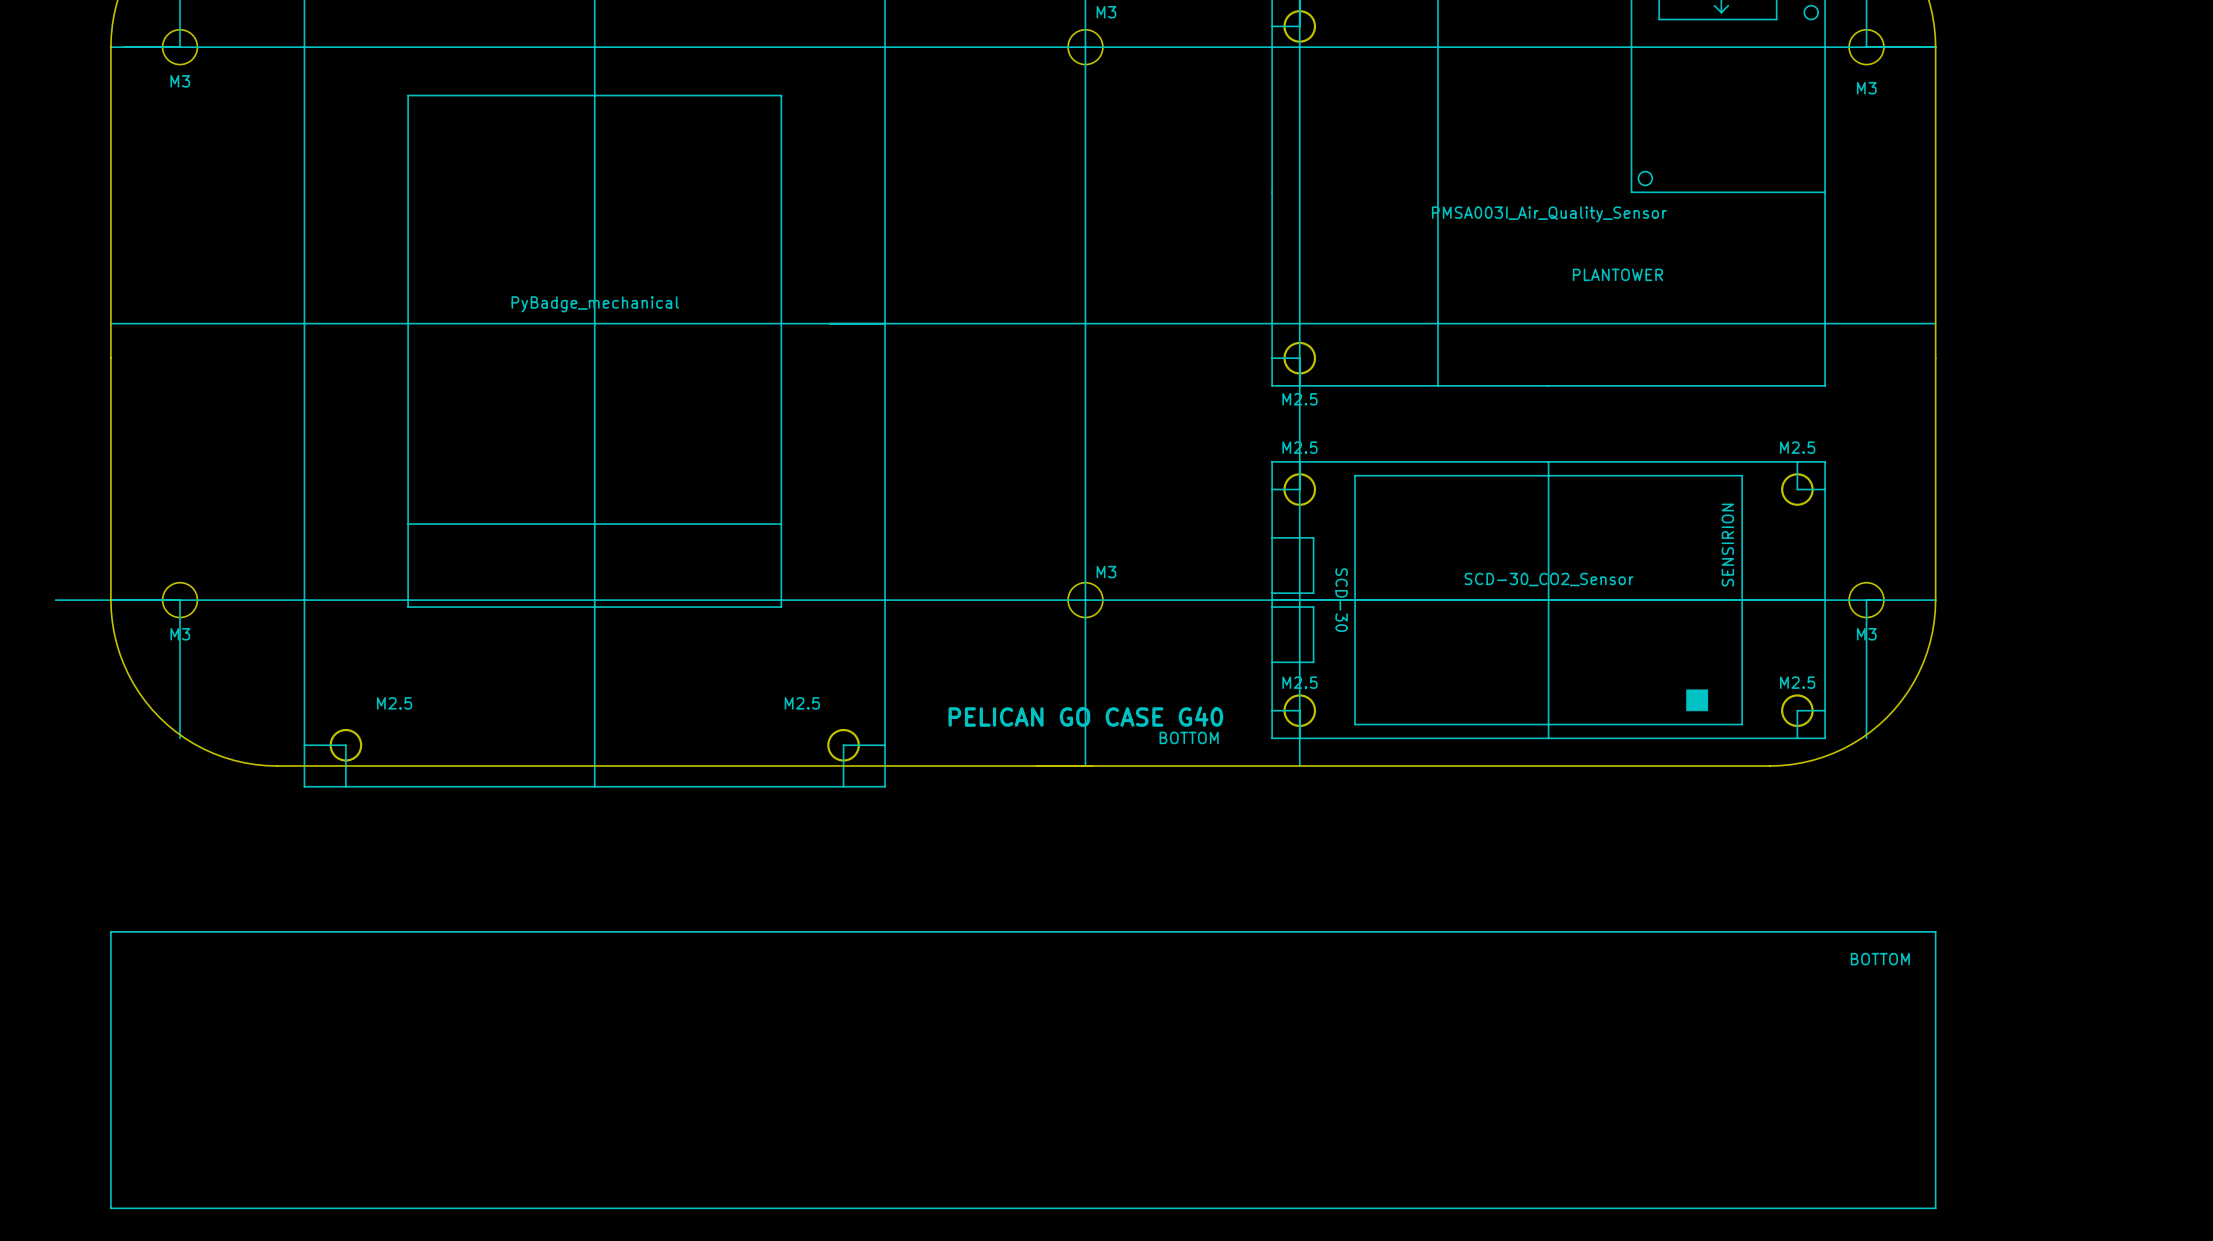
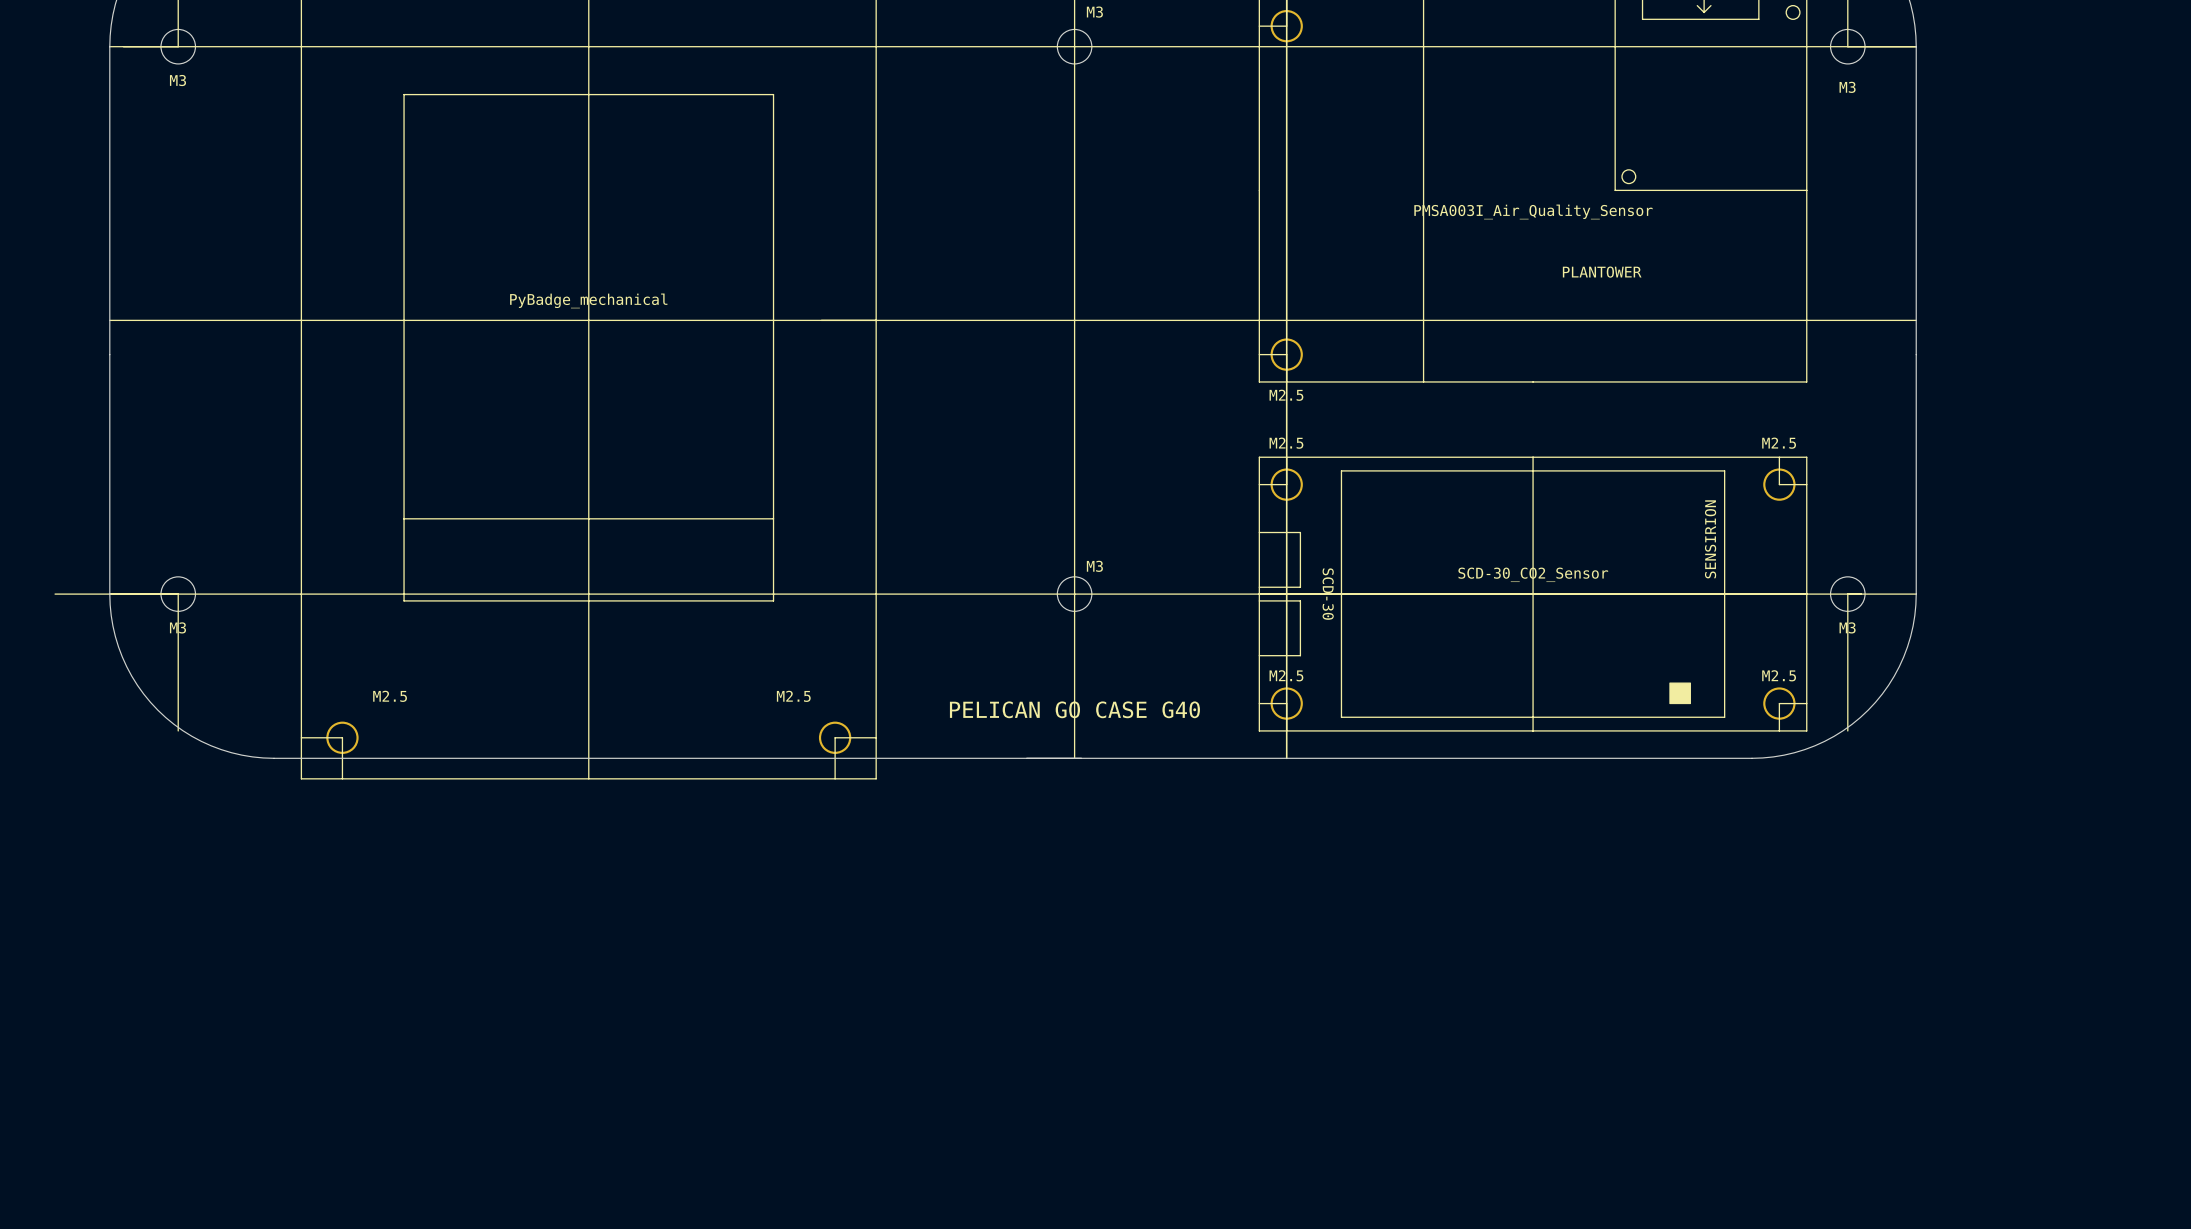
text: BOTTOM (1189, 737) -> none
line: (110, 931) (110, 1208) (1935, 1208) (1935, 931) (110, 931) -> none
text: BOTTOM (1880, 959) -> none

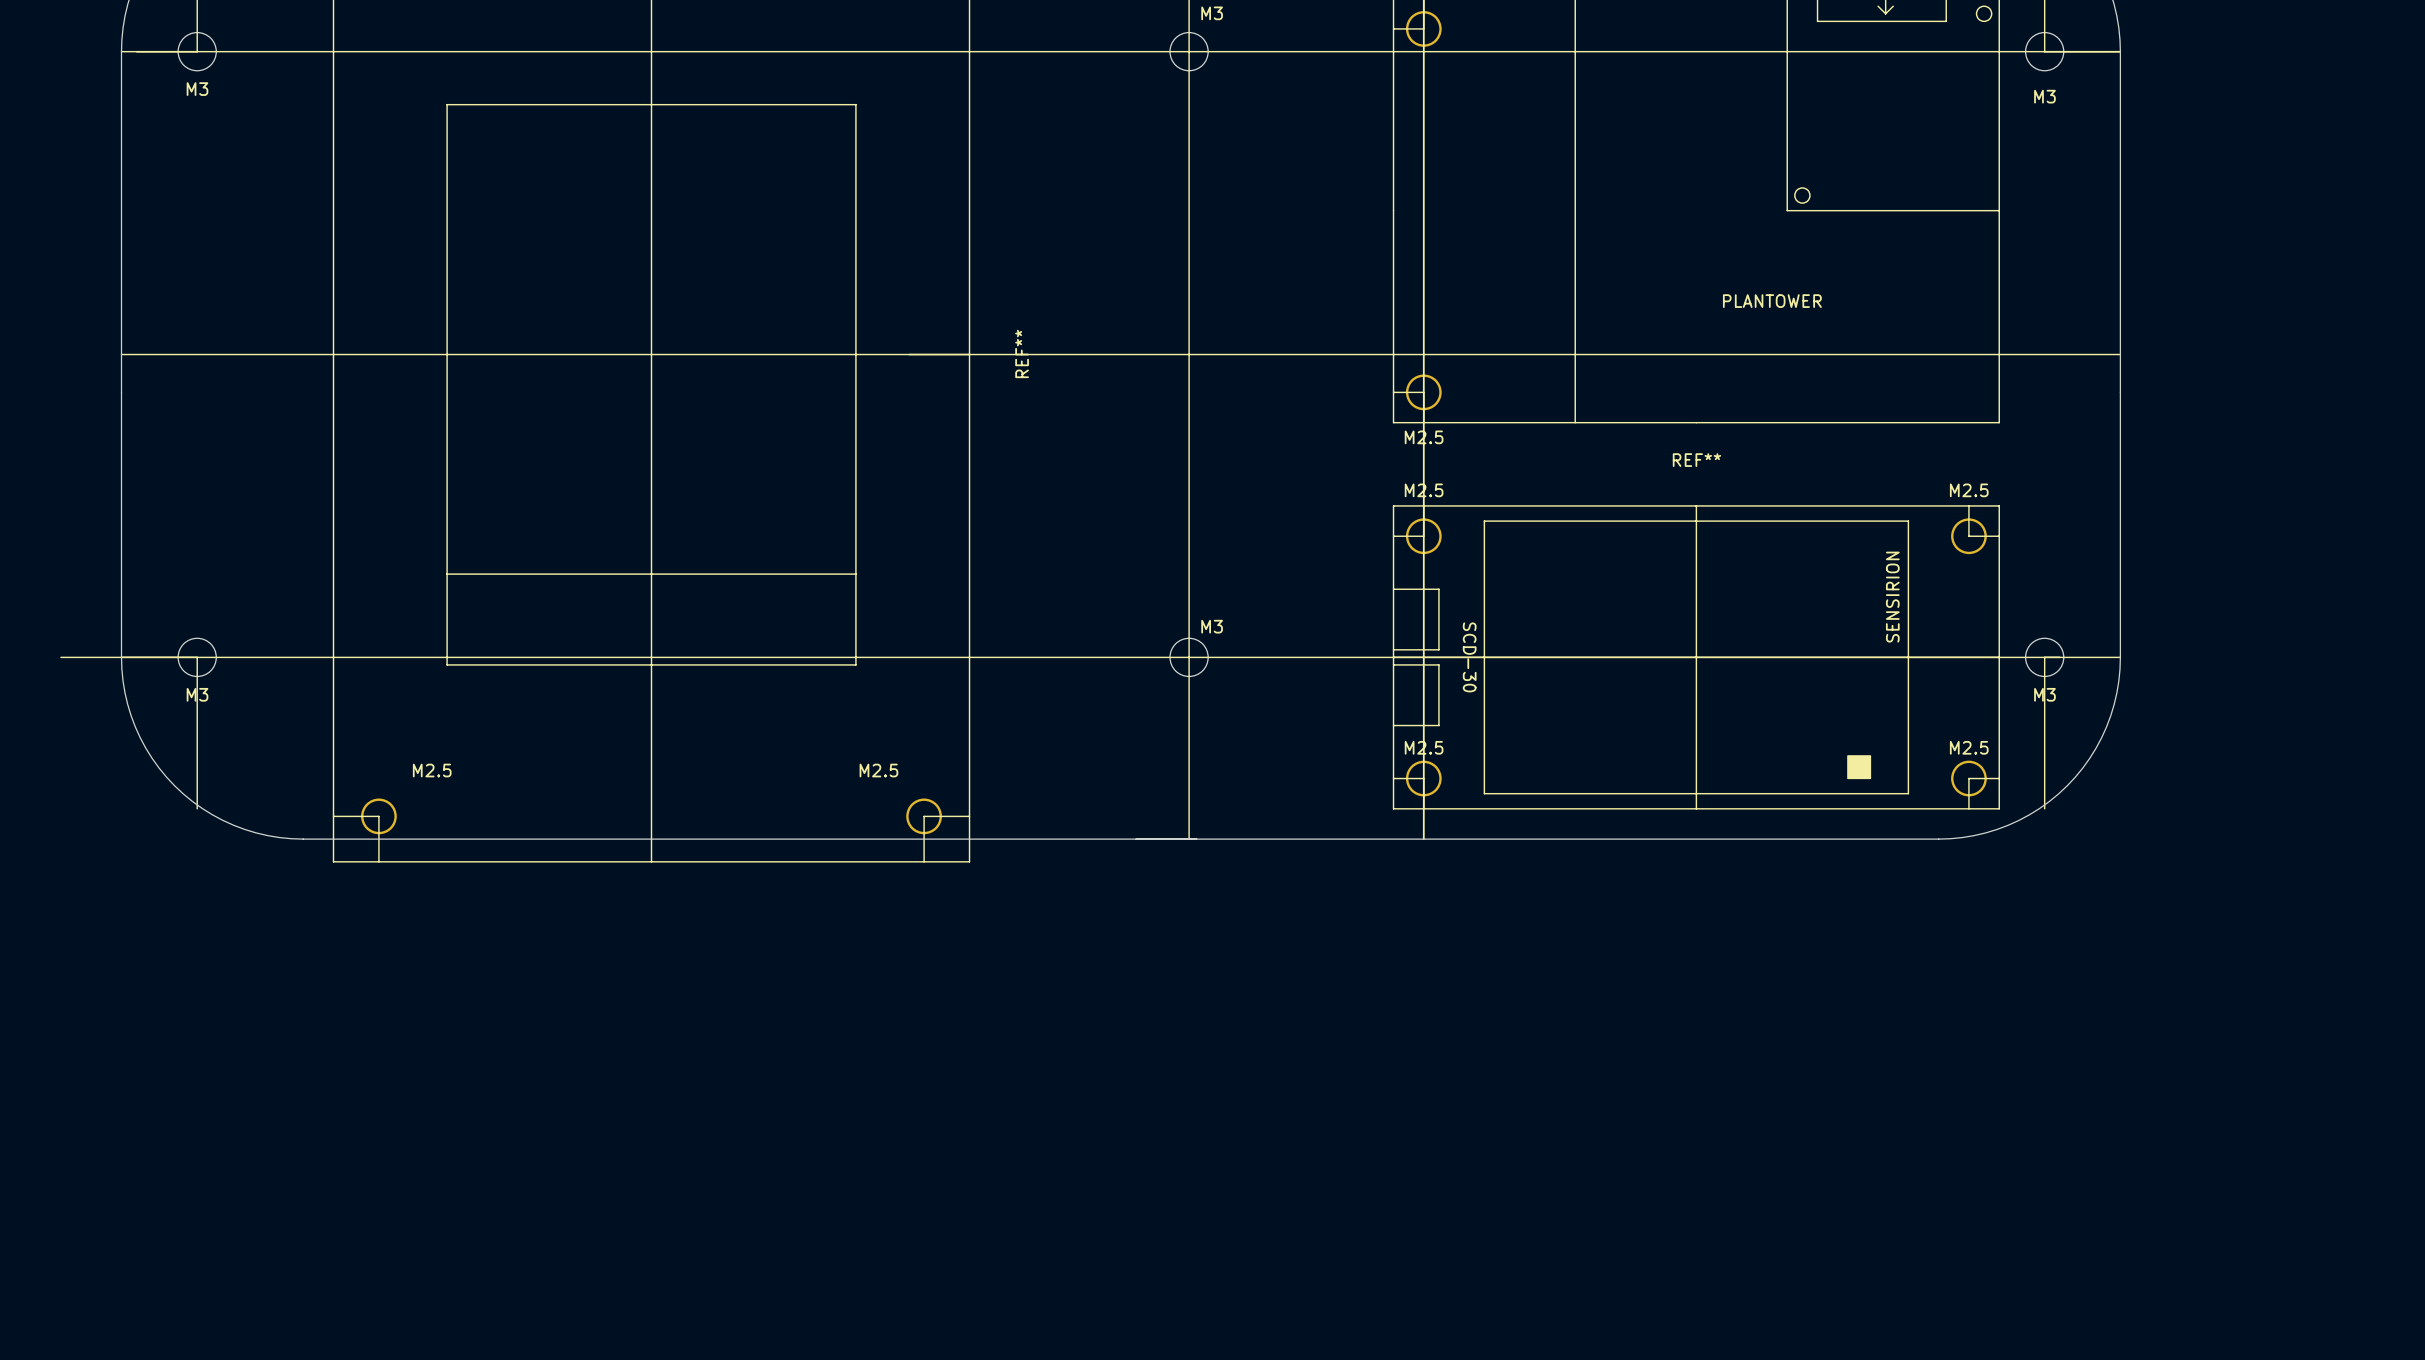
part value: PMSA003I_Air_Quality_Sensor (1533, 211) -> none
REF** value: PyBadge_mechanical (588, 300) -> none
REF** name: none -> REF** (1022, 353)
REF** name: none -> REF** (1696, 460)
REF** value: SCD-30_CO2_Sensor (1533, 574) -> none
text: PELICAN GO CASE G40 (1074, 709) -> none

